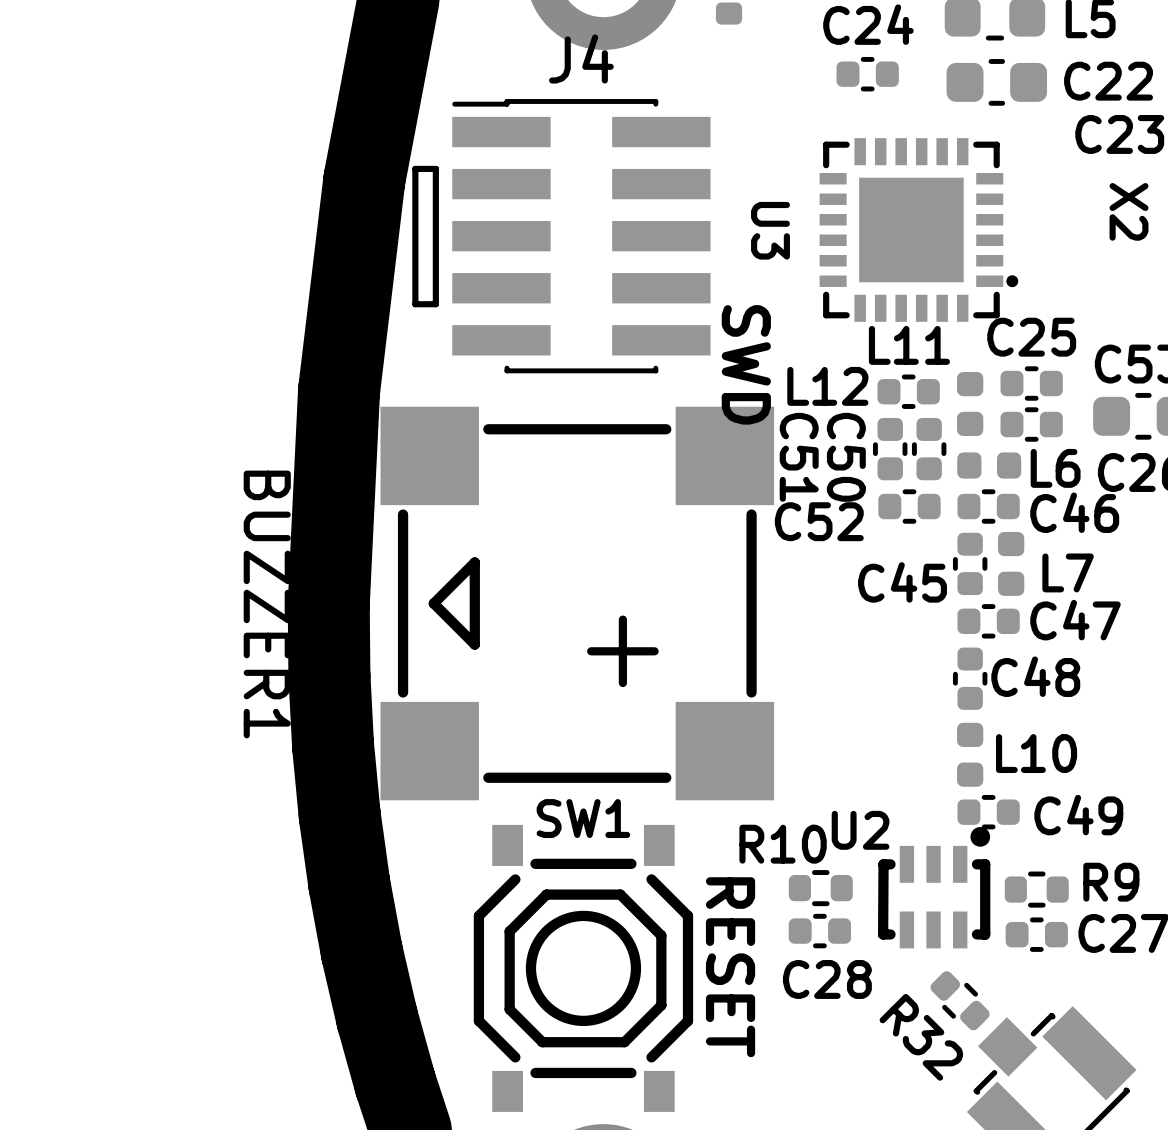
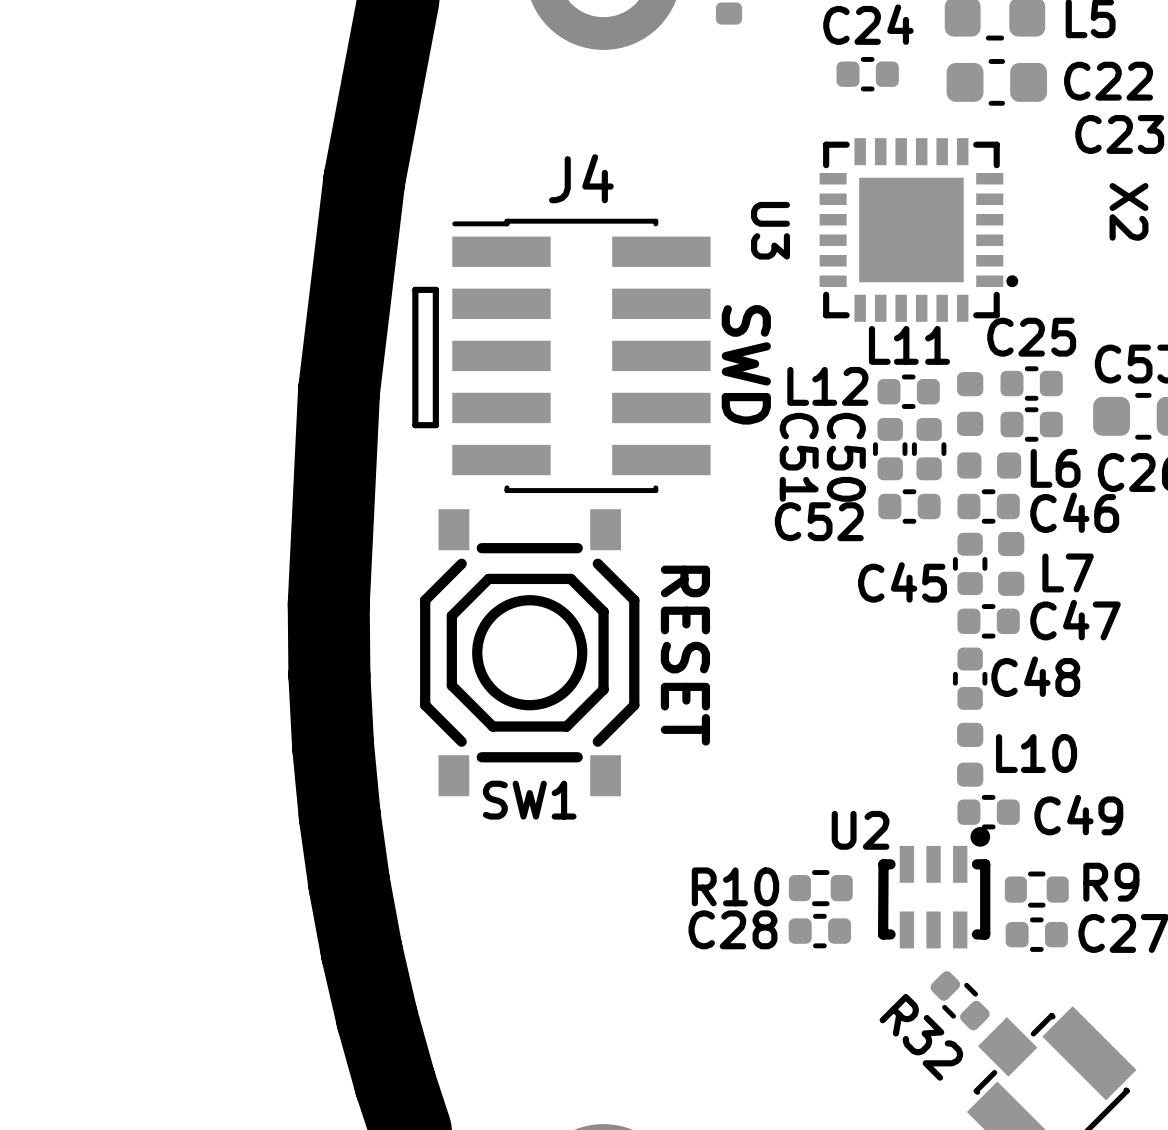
J4 position: (581, 236) -> (581, 355)
line: (435, 289) (435, 168) (415, 168) (415, 289) -> (435, 289) (415, 289)
line: (435, 304) (415, 304) -> (435, 304) (435, 425) (415, 425) (415, 304)
BUZZER1: (577, 603) -> none
R10 name position: R10 (783, 844) -> R10 (735, 886)
SW1 rotation: 0° (583, 968) -> 180° (529, 652)
SW1 position: (583, 968) -> (529, 652)
C28 name position: C28 (827, 979) -> C28 (732, 929)

